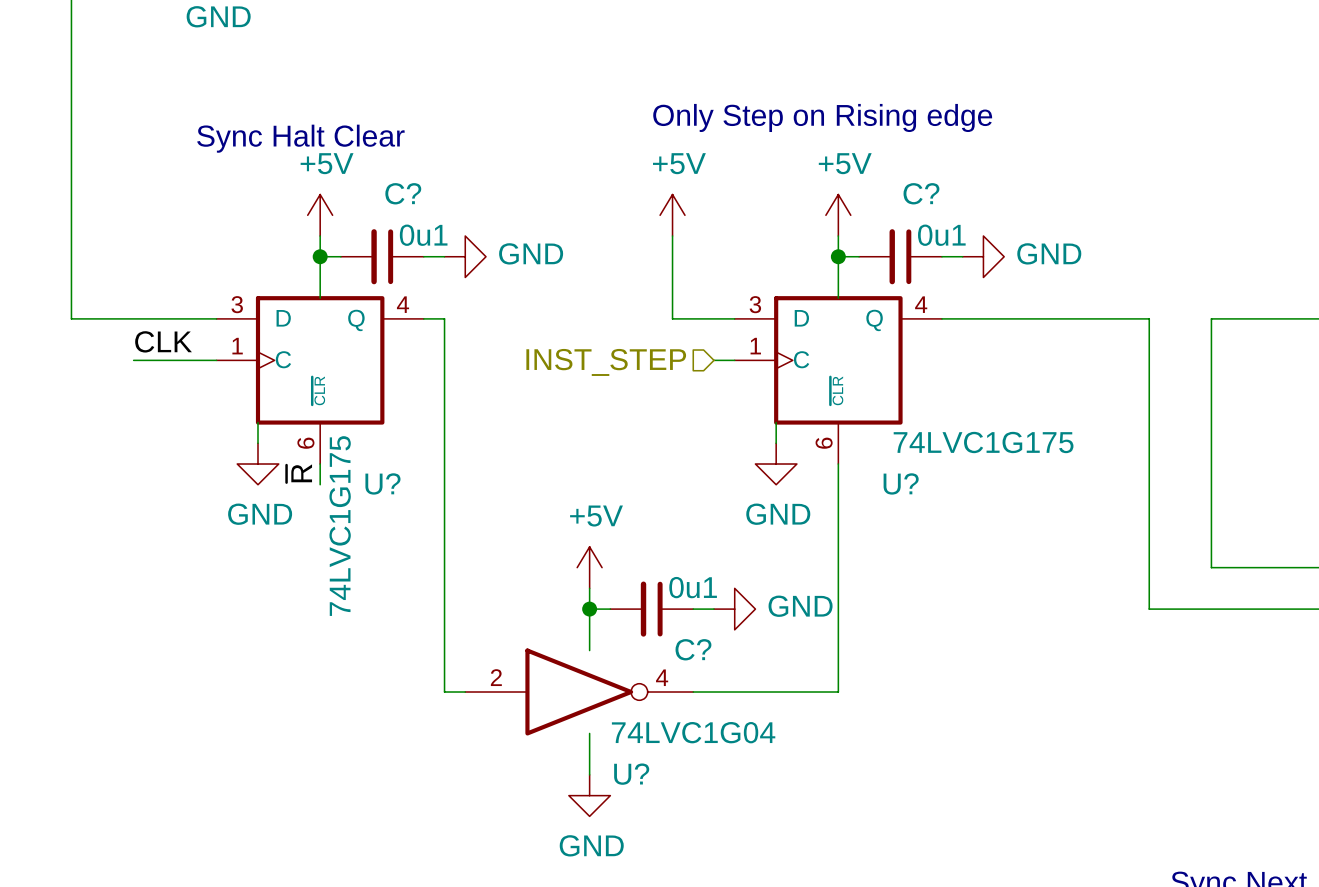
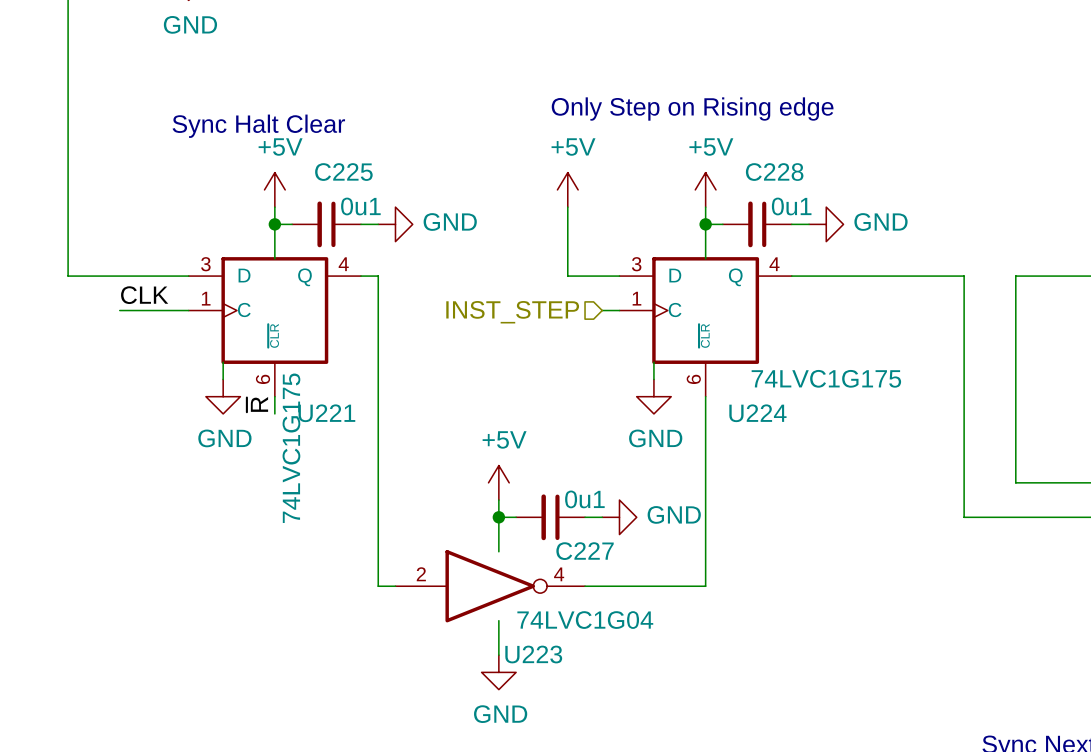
C? name: C? (403, 193) -> C225 (343, 172)
C? name: C? (921, 193) -> C228 (774, 172)
U? name: U? (382, 483) -> U221 (326, 413)
U? name: U? (901, 483) -> U224 (757, 413)
C? name: C? (693, 649) -> C227 (585, 551)
U? name: U? (631, 774) -> U223 (533, 654)

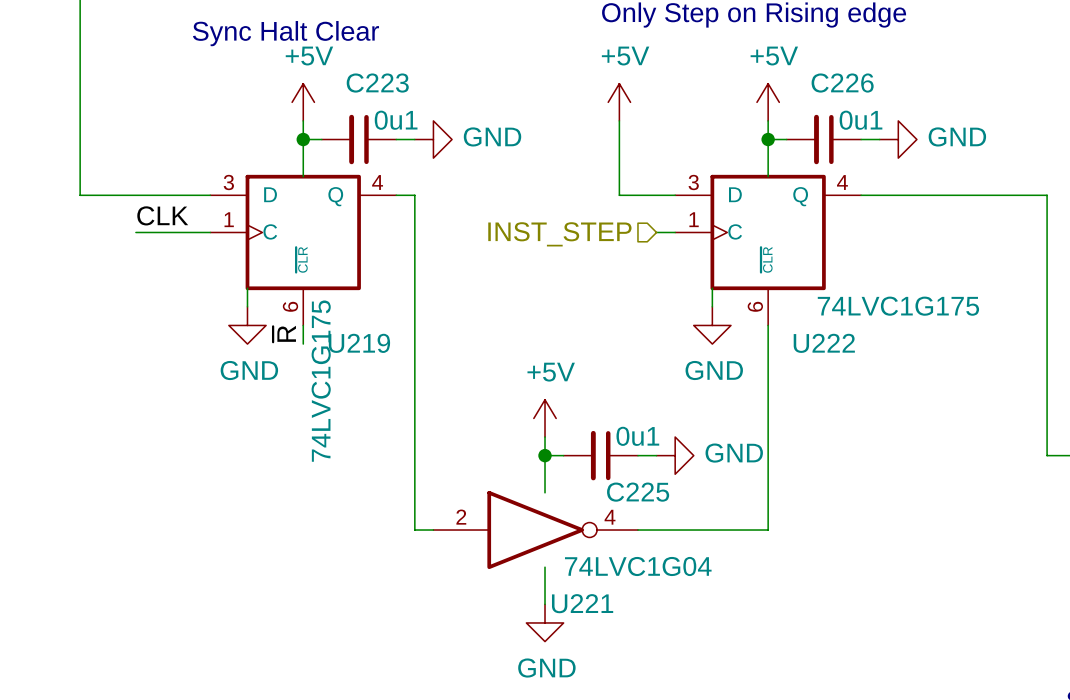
C225 name: C225 (343, 172) -> C223 (377, 83)
C228 name: C228 (774, 172) -> C226 (842, 83)
U221 name: U221 (326, 413) -> U219 (359, 343)
U224 name: U224 (757, 413) -> U222 (824, 343)
C227 name: C227 (585, 551) -> C225 (638, 492)
U223 name: U223 (533, 654) -> U221 (582, 603)

